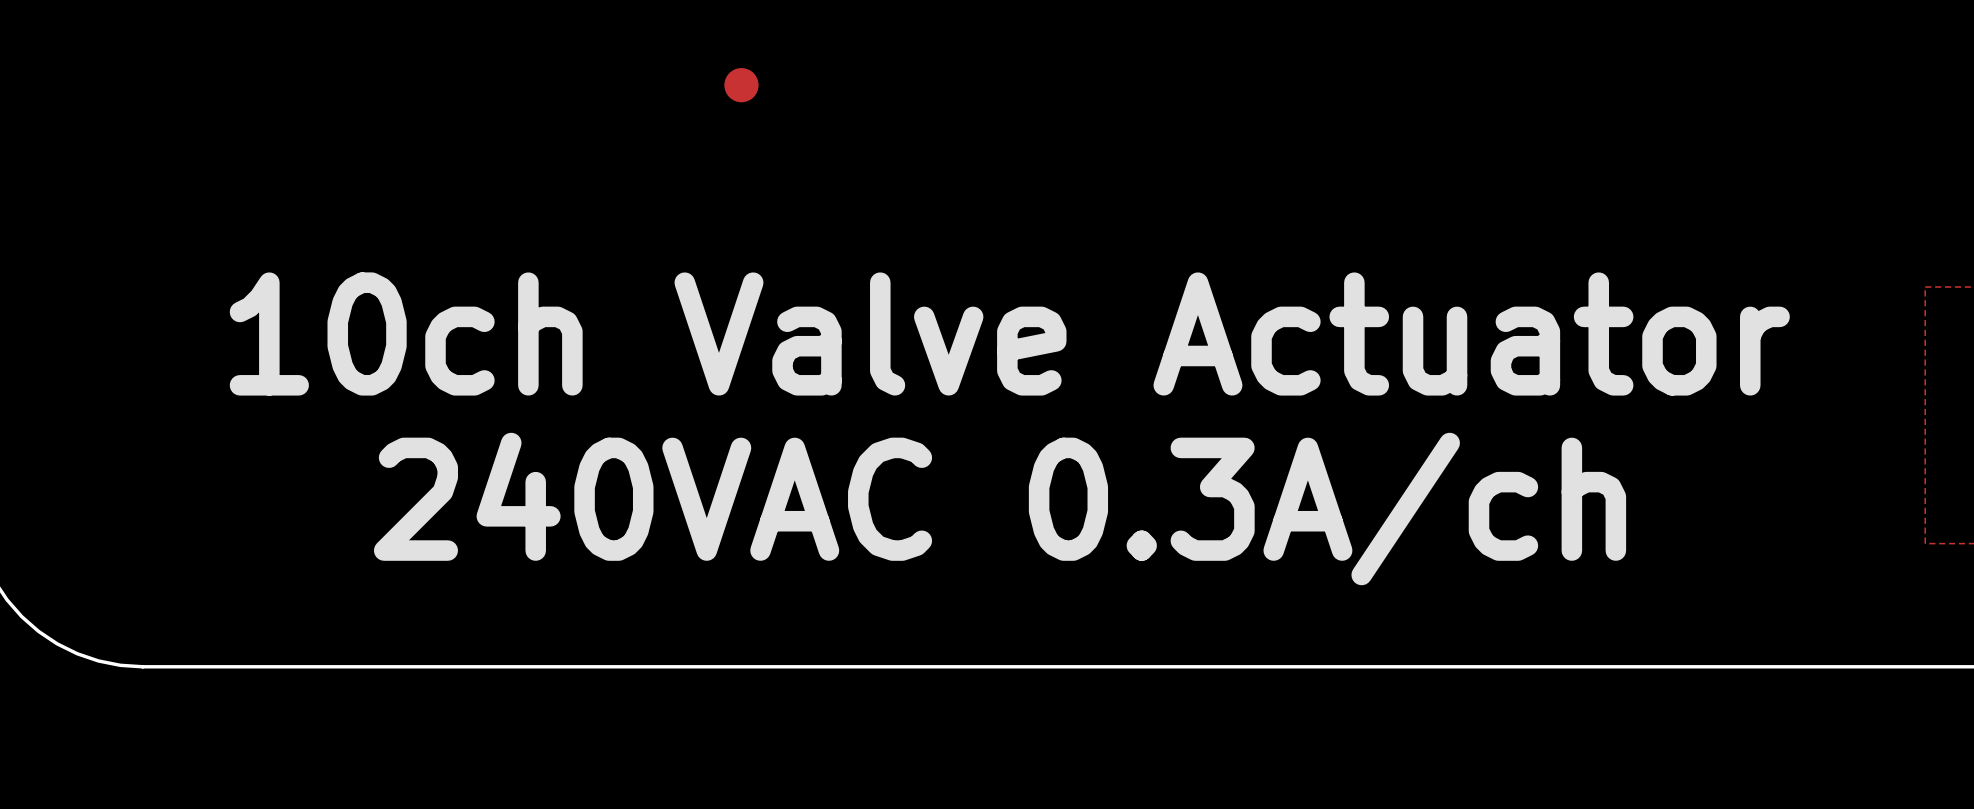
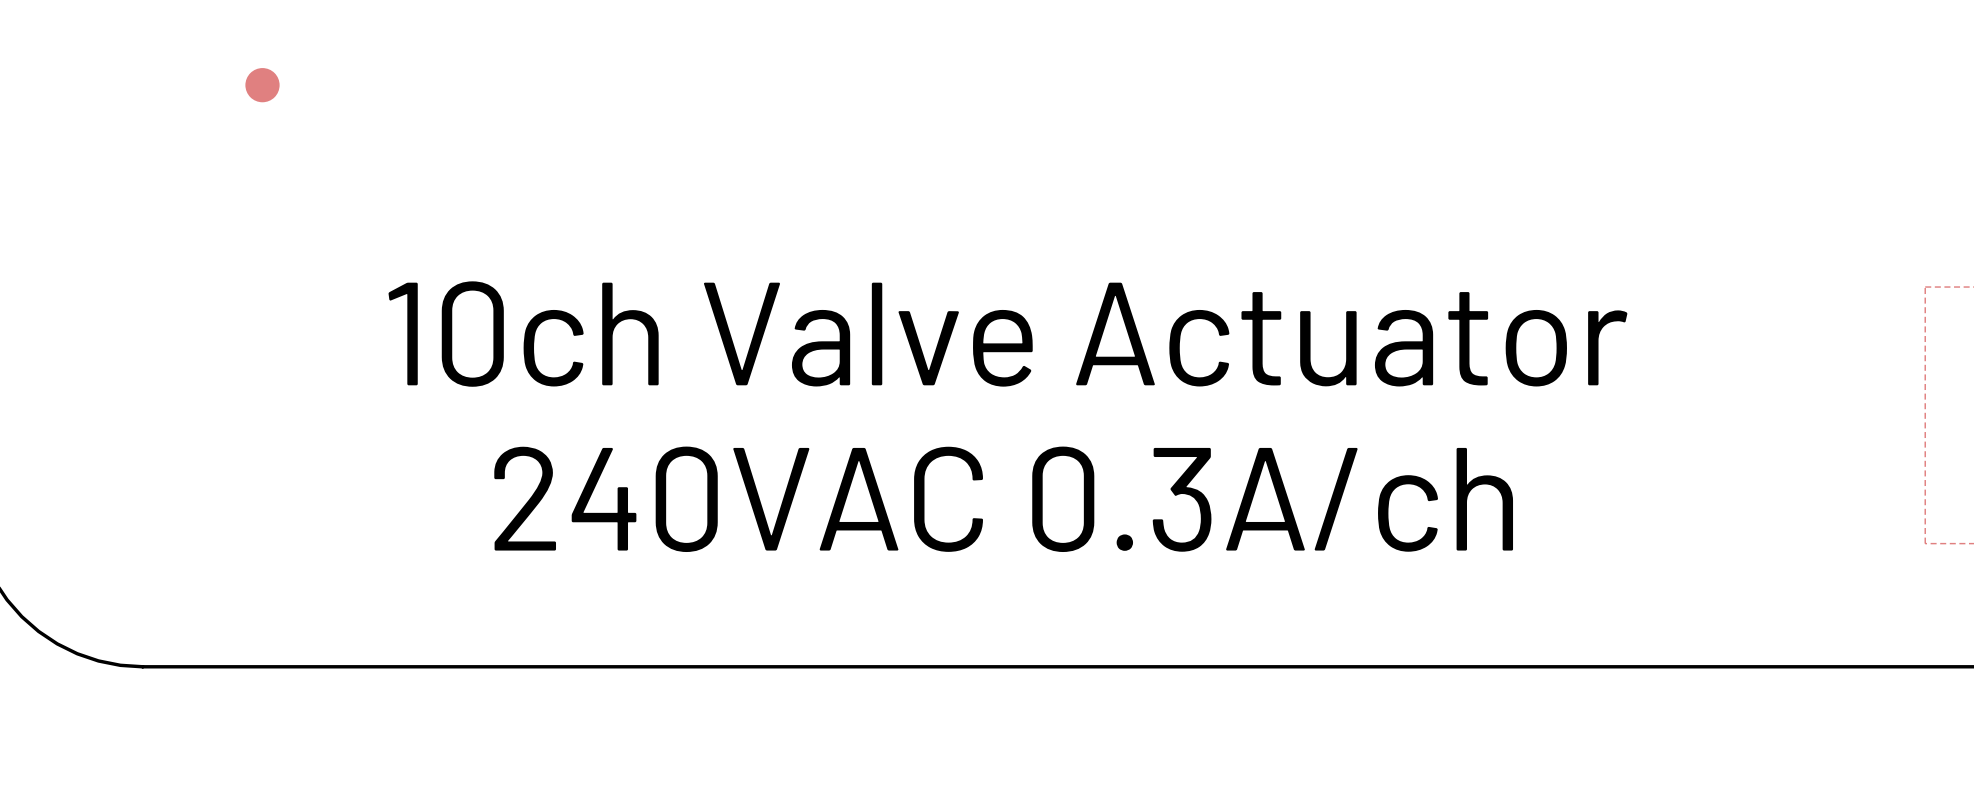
part position: (741, 85) -> (262, 85)

